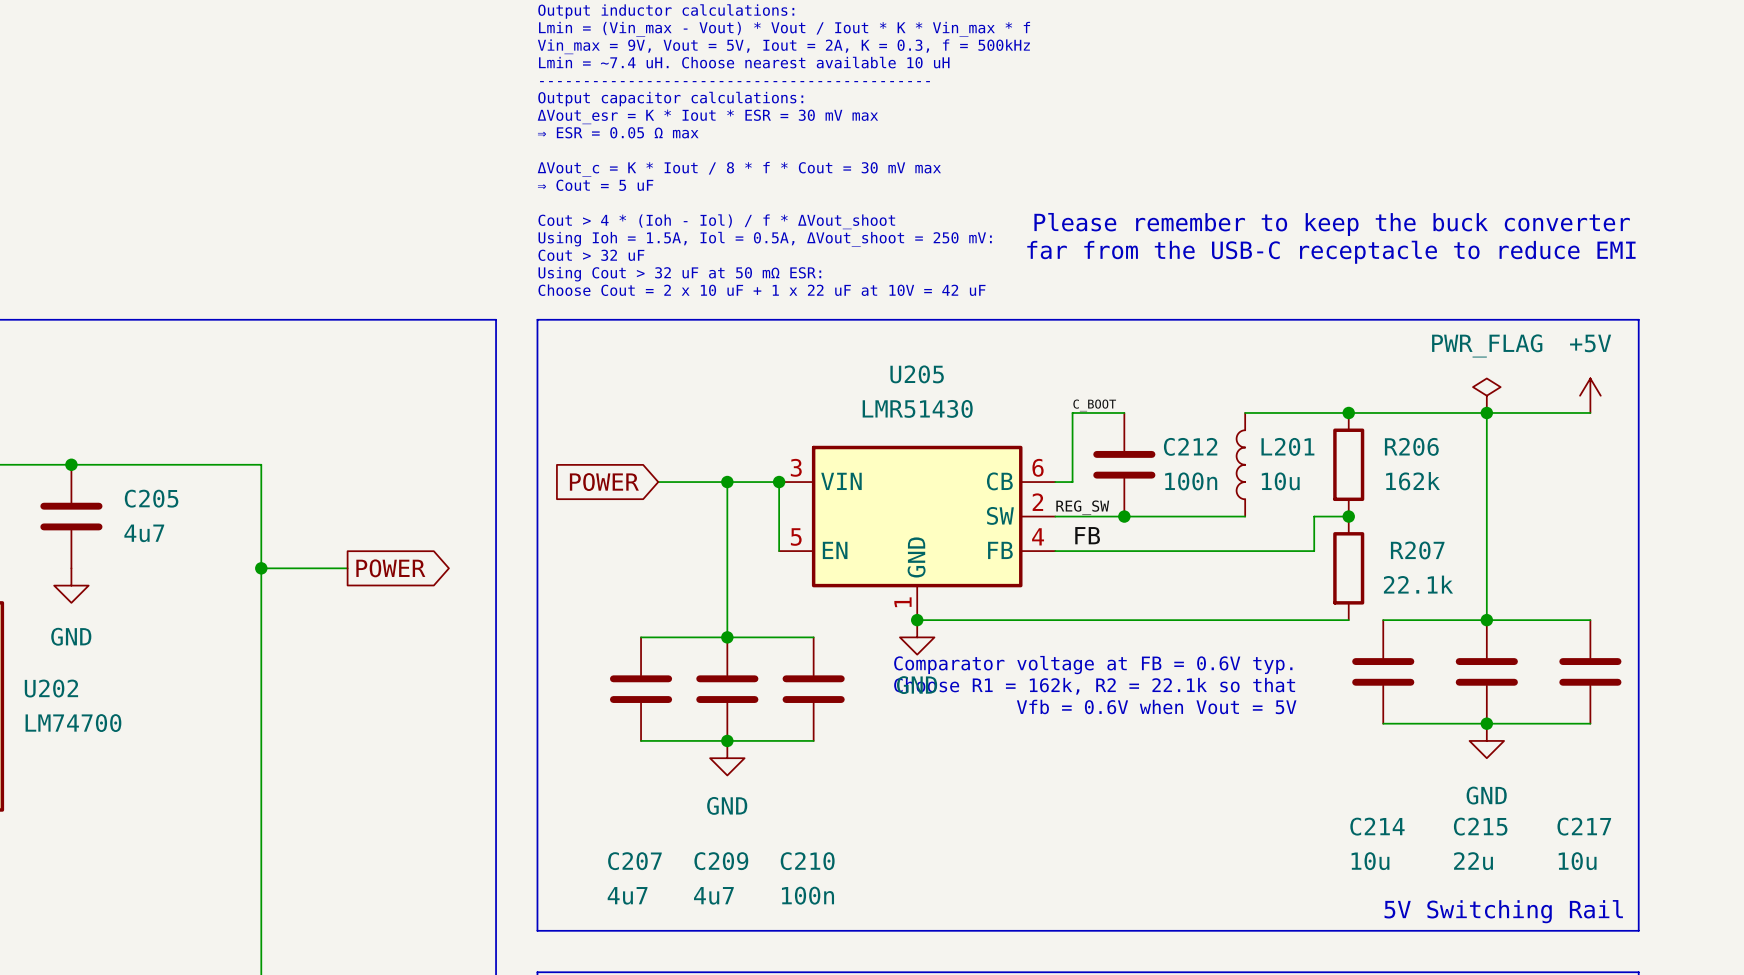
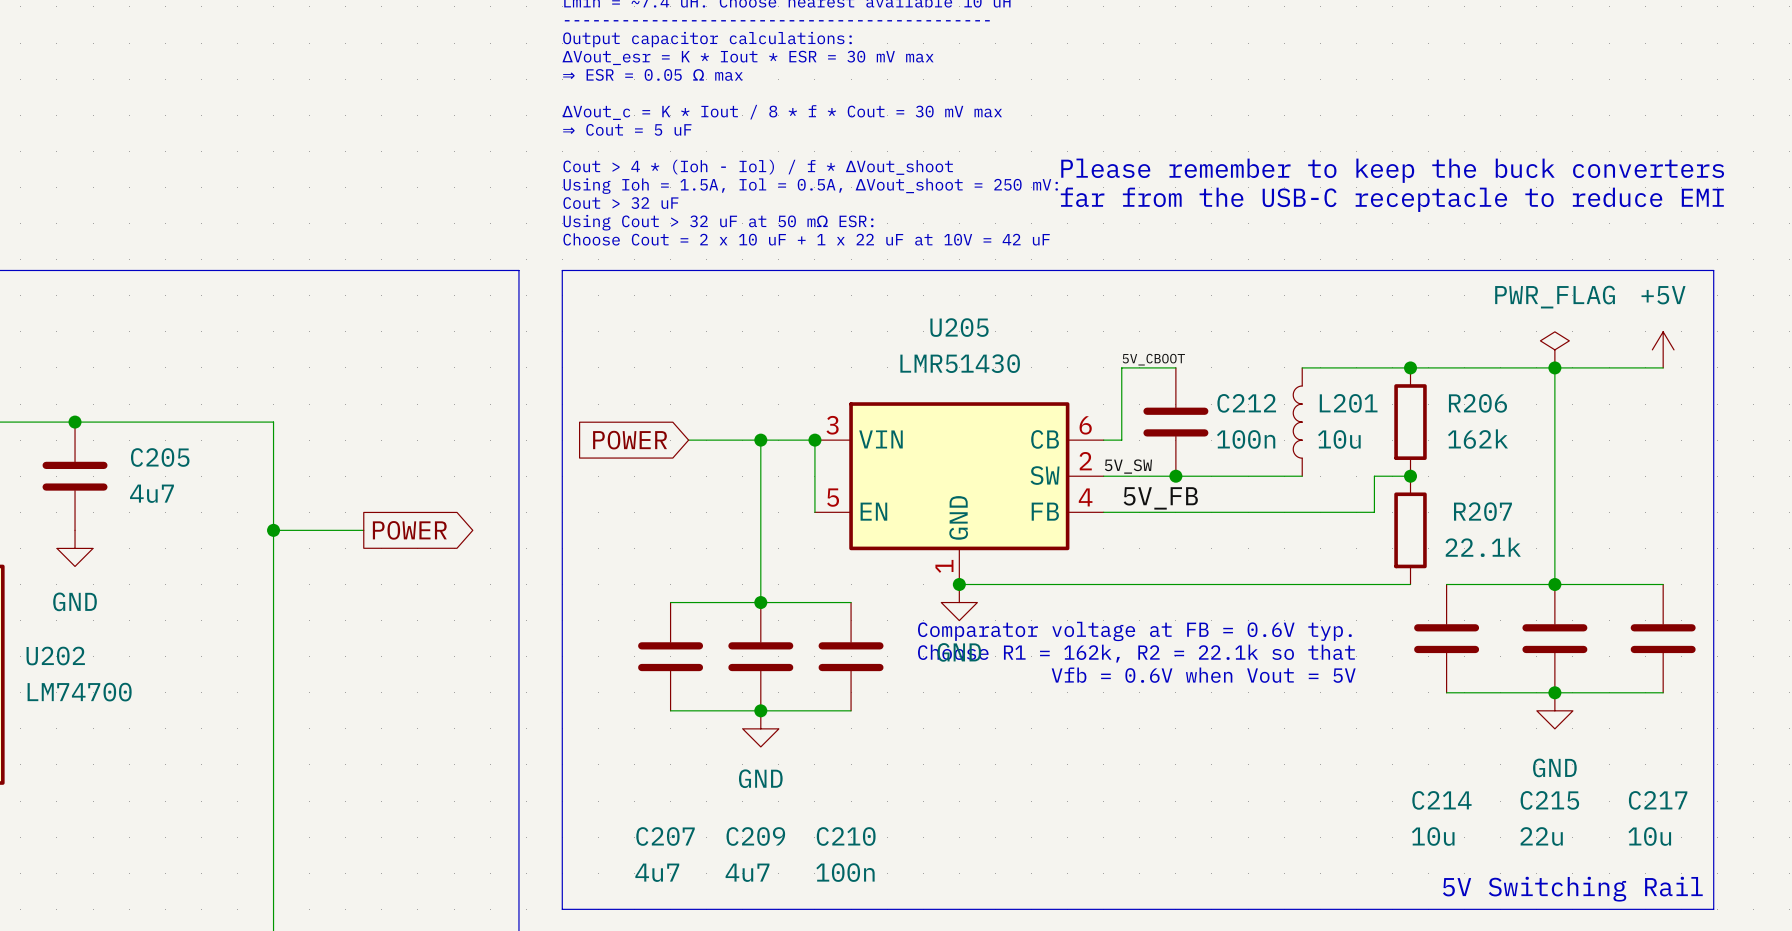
text: Please remember to keep the buck converter (1332, 224) -> Please remember to keep the buck converters (1392, 170)
label: C_BOOT (1094, 405) -> 5V_CBOOT (1153, 359)
label: REG_SW (1082, 507) -> 5V_SW (1128, 466)
label: FB (1087, 535) -> 5V_FB (1160, 498)

